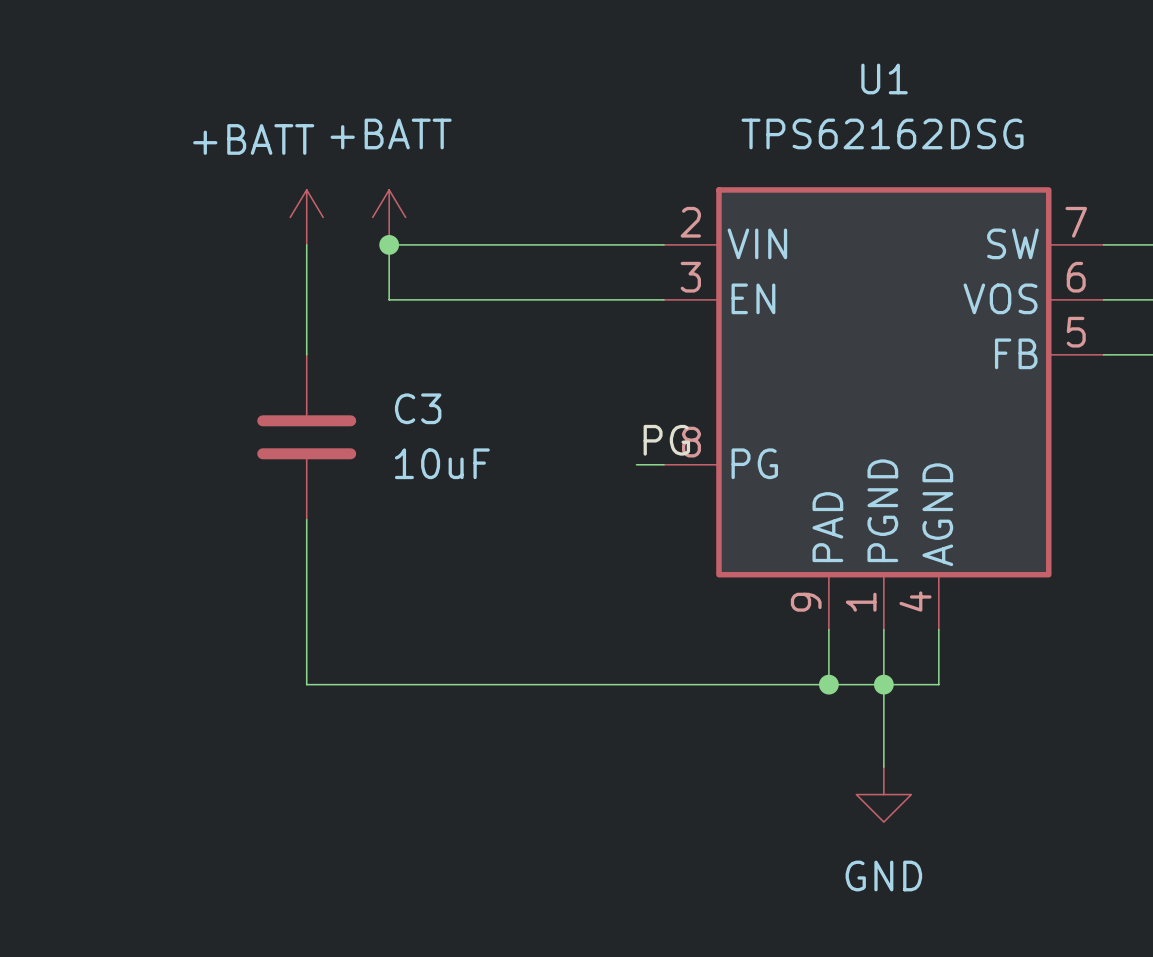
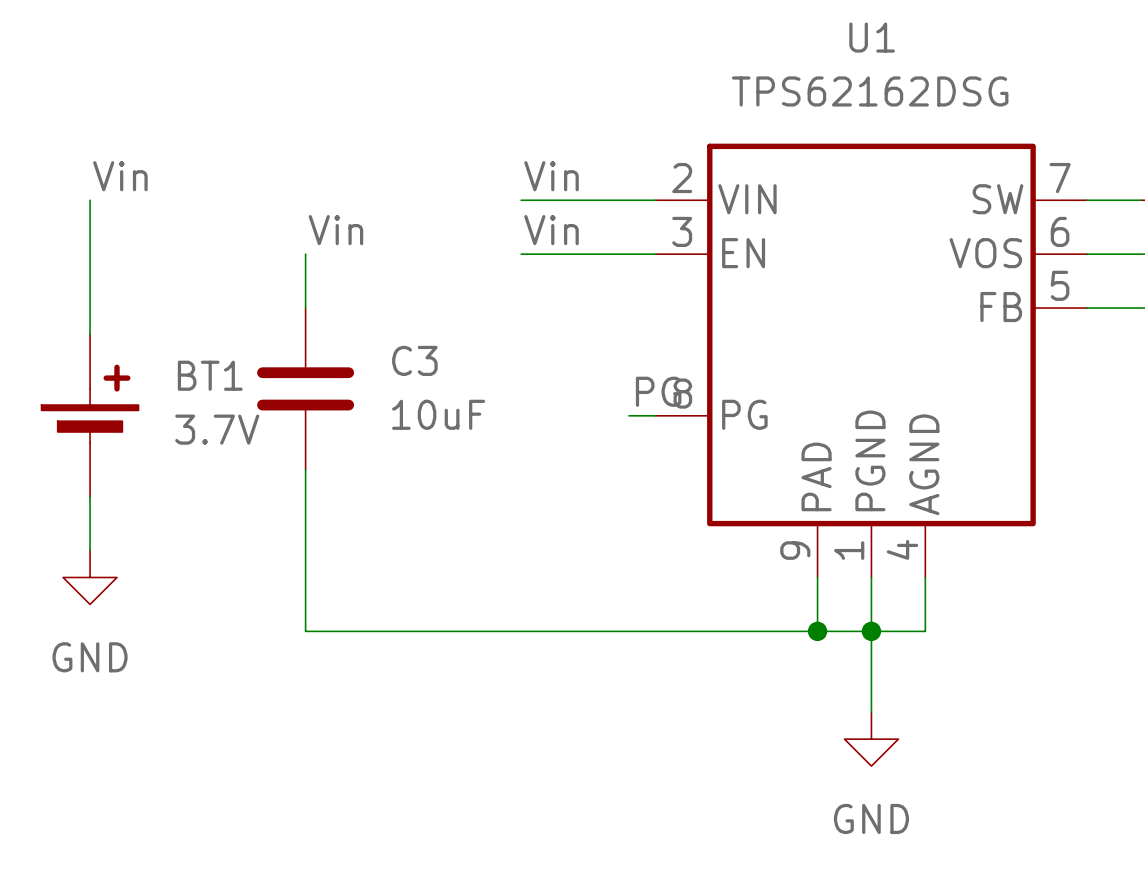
power symbol: +BATT (306, 217) -> none
power symbol: +BATT (389, 217) -> none
label: none -> Vin (120, 176)
label: none -> Vin (551, 176)
wire: none -> (90, 200) (90, 334)
wire: (306, 244) (306, 299) -> (90, 496) (90, 550)
junction: (389, 244) -> none
wire: (526, 244) (389, 244) (389, 299) (526, 299) -> none
label: none -> Vin (335, 230)
label: none -> Vin (551, 230)
BT1: none -> 3.7V (90, 415)
power symbol: none -> GND (90, 577)

